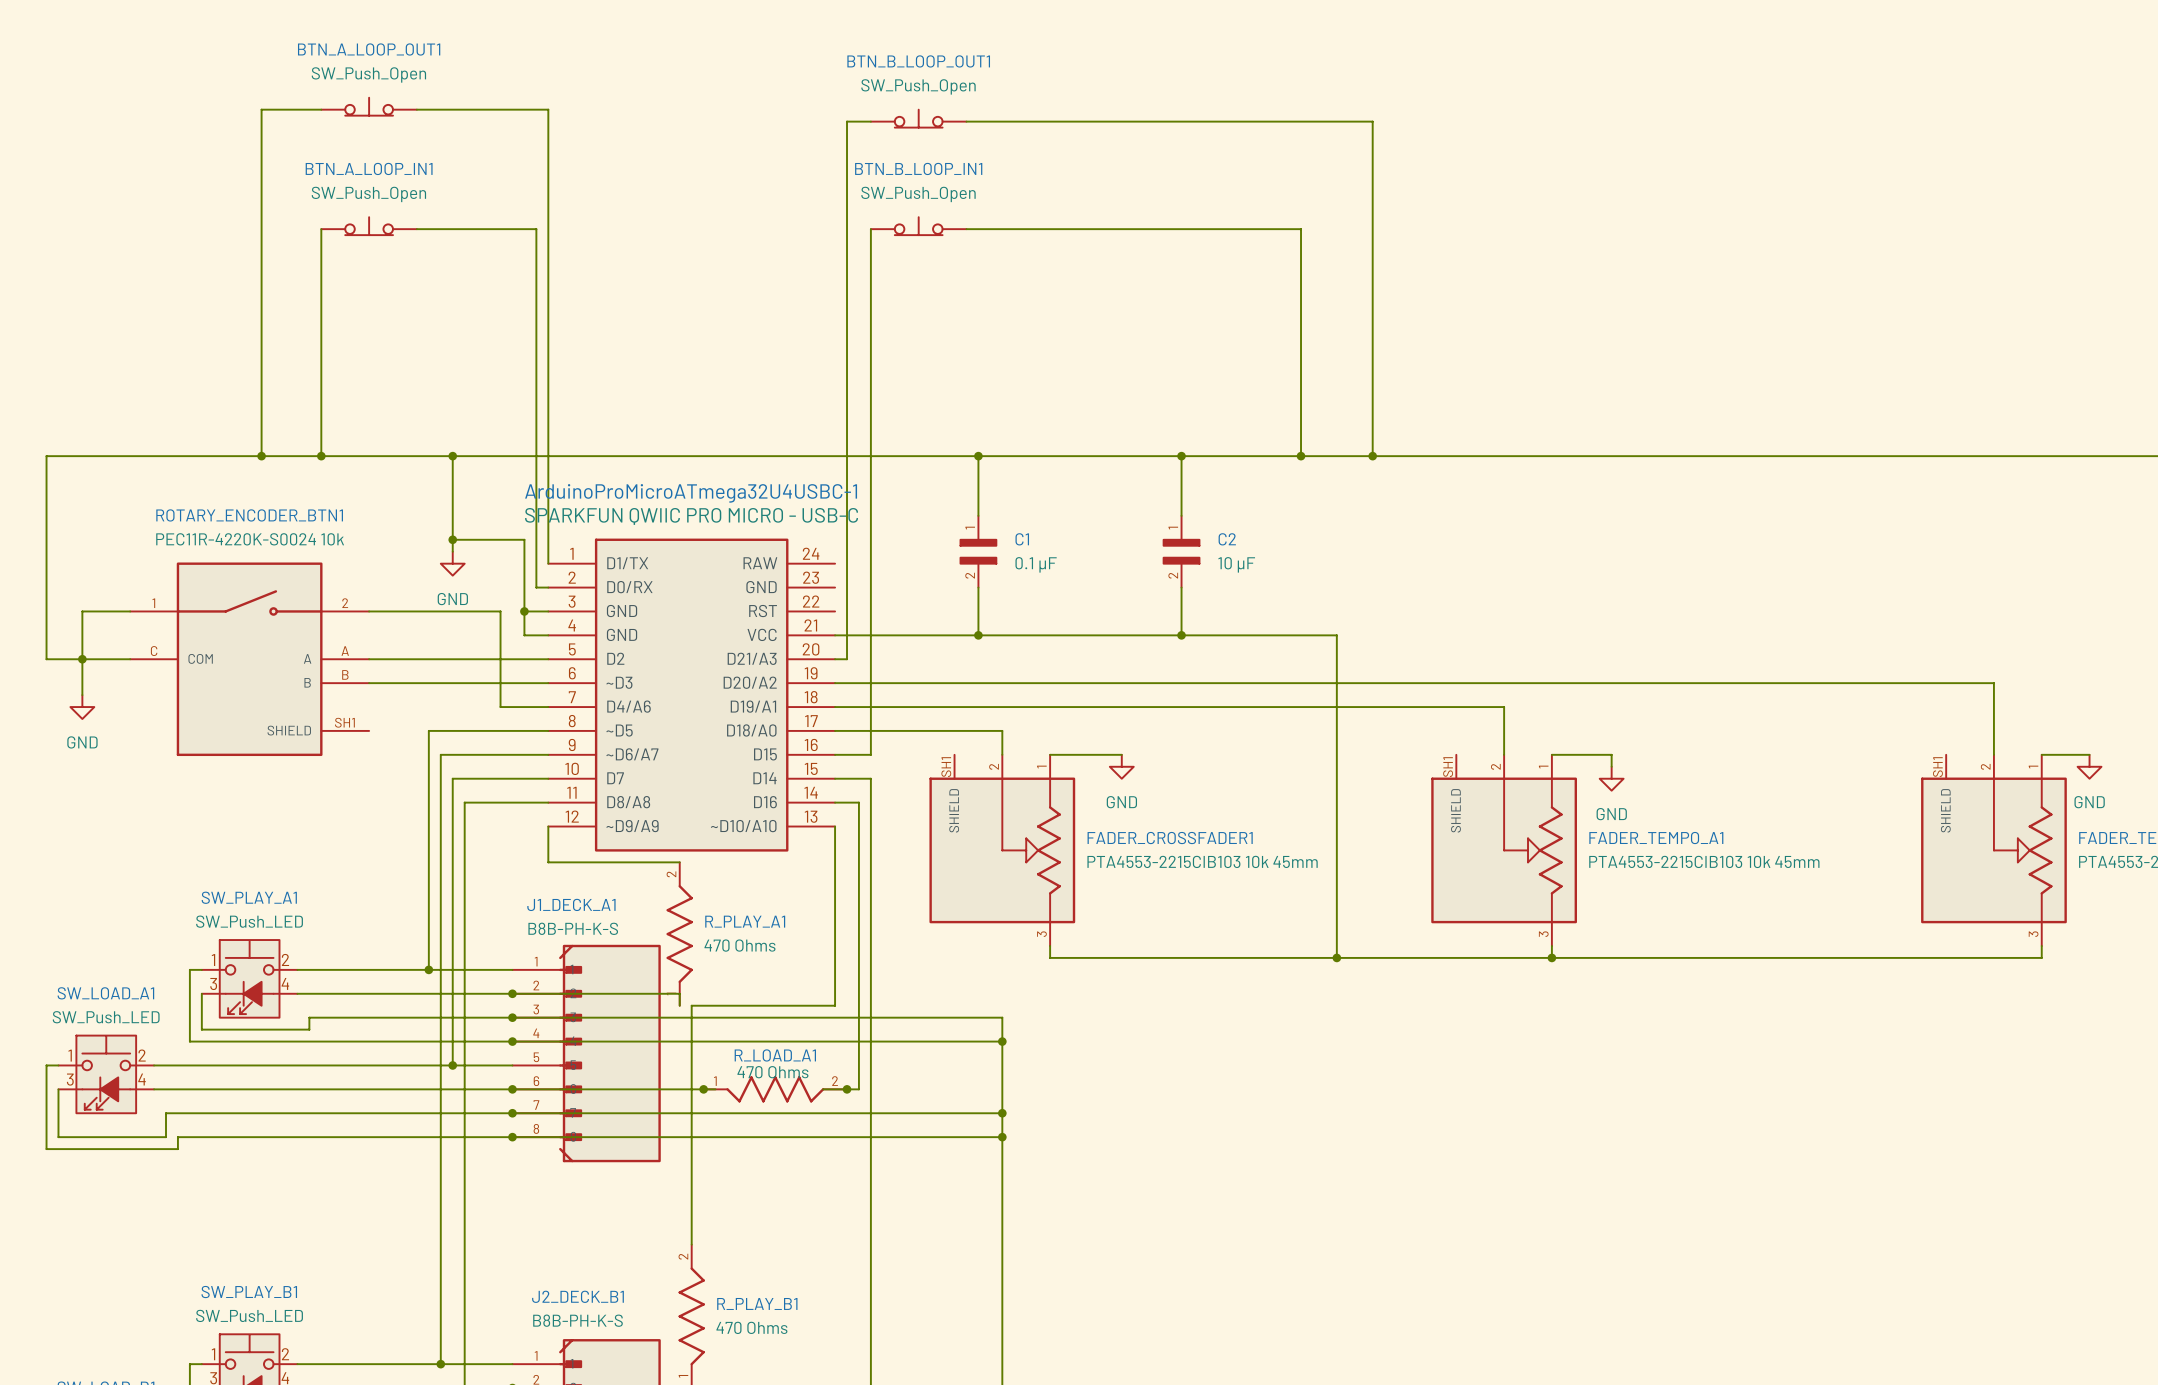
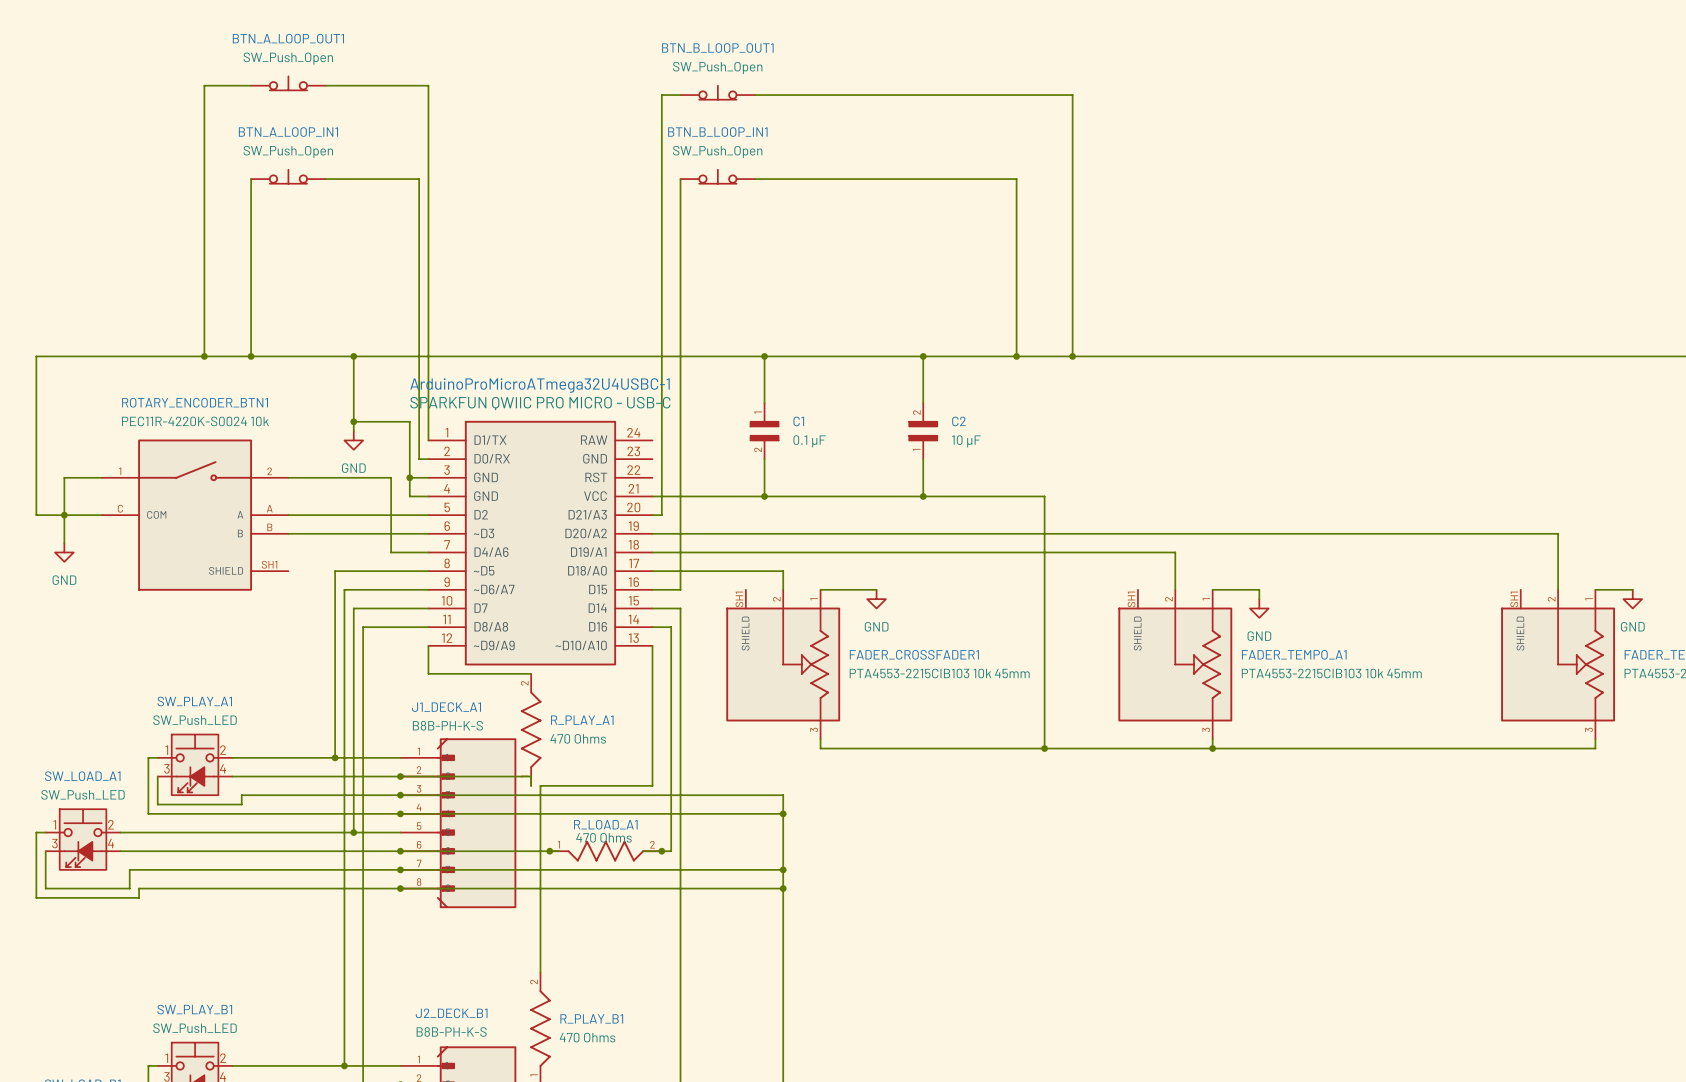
C2 rotation: 0° (1181, 551) -> 180° (923, 431)

